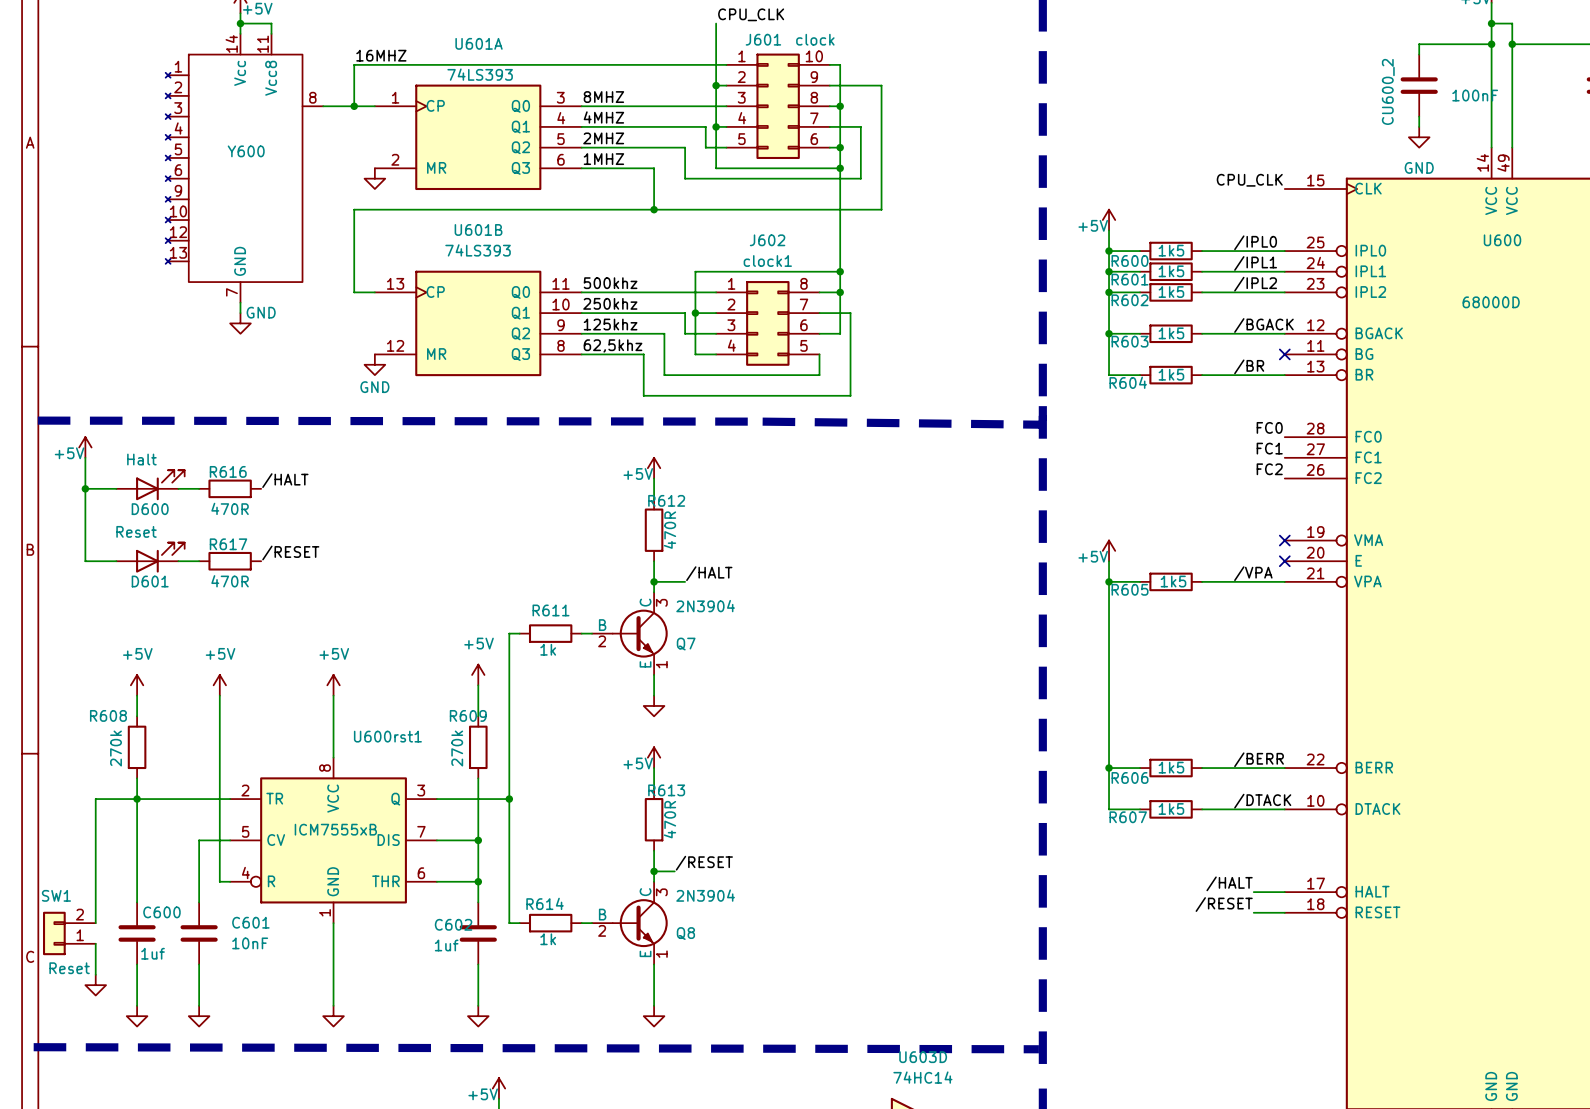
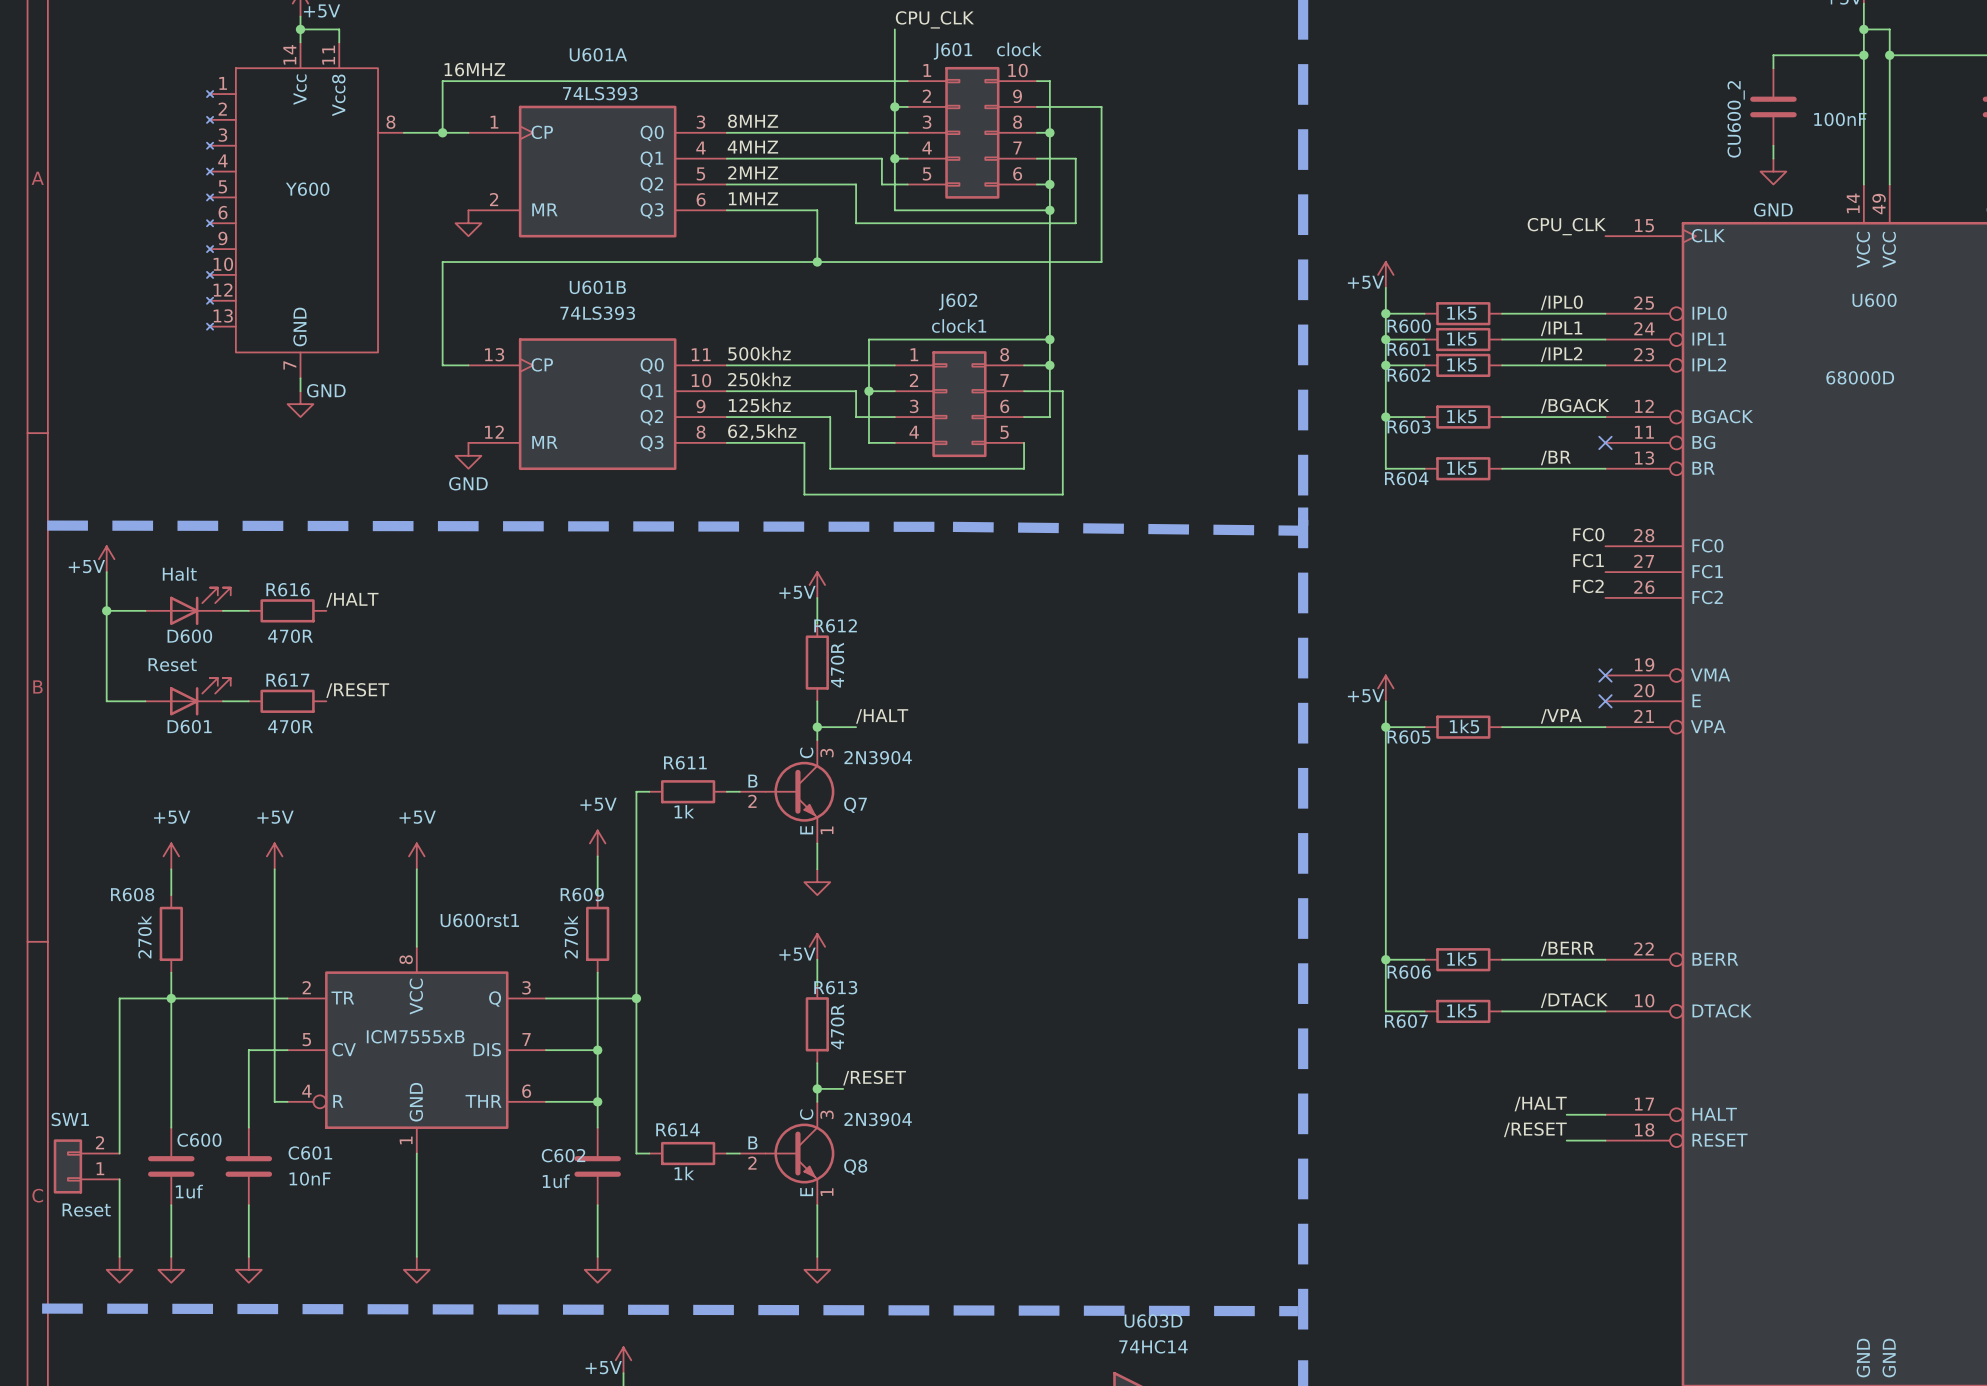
wire: none -> (119, 1218) (119, 1256)
power symbol position: (95, 985) -> (119, 1269)

